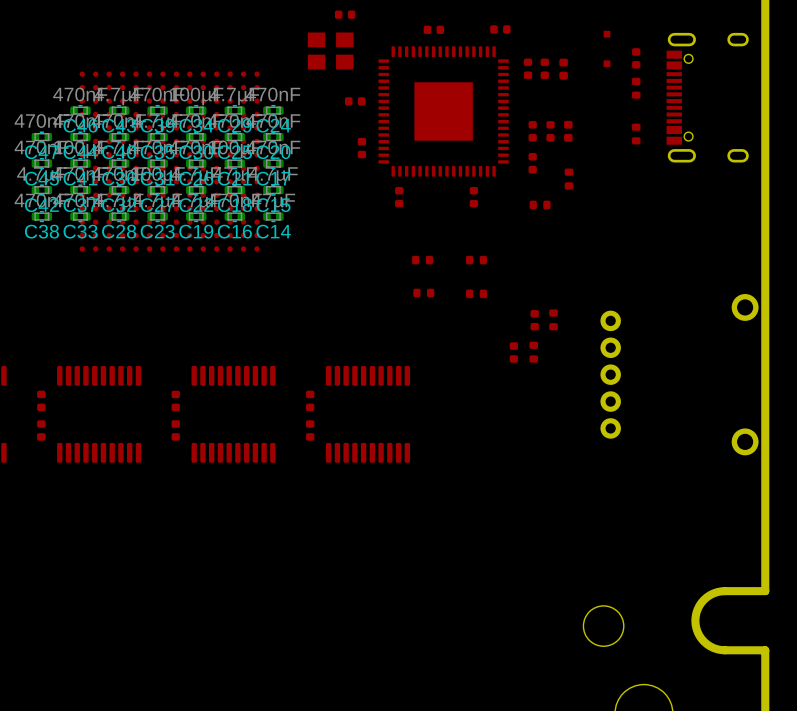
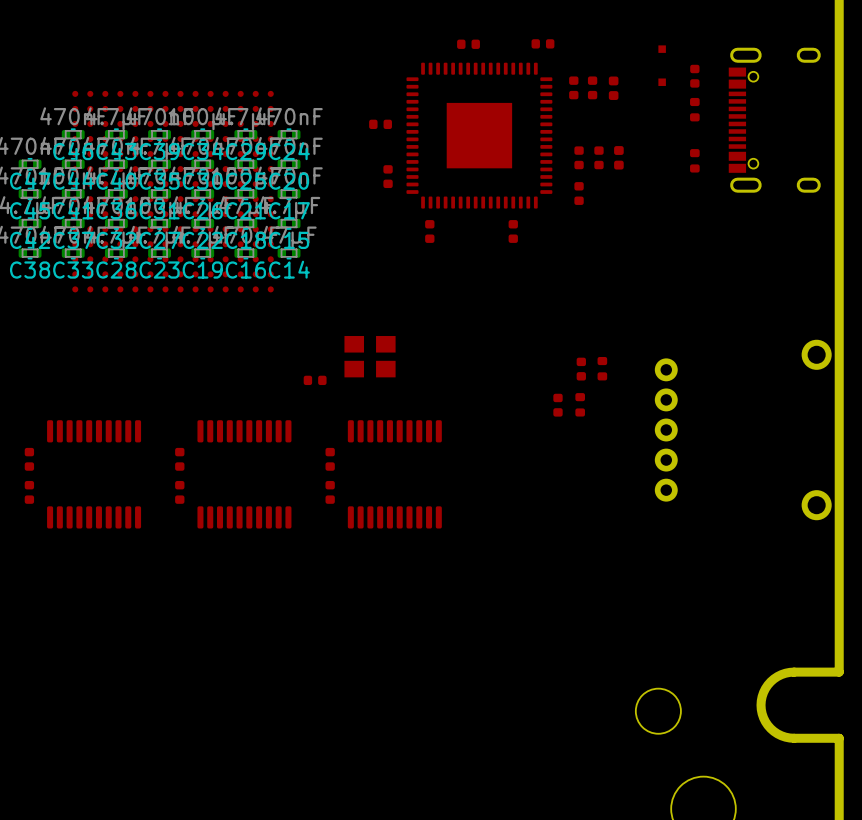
part position: (345, 14) -> (315, 380)
part position: (330, 50) -> (370, 356)
part: (568, 179) -> none
part: (540, 204) -> none
part: (422, 260) -> none
part: (476, 260) -> none
part: (423, 292) -> none
part: (476, 293) -> none

